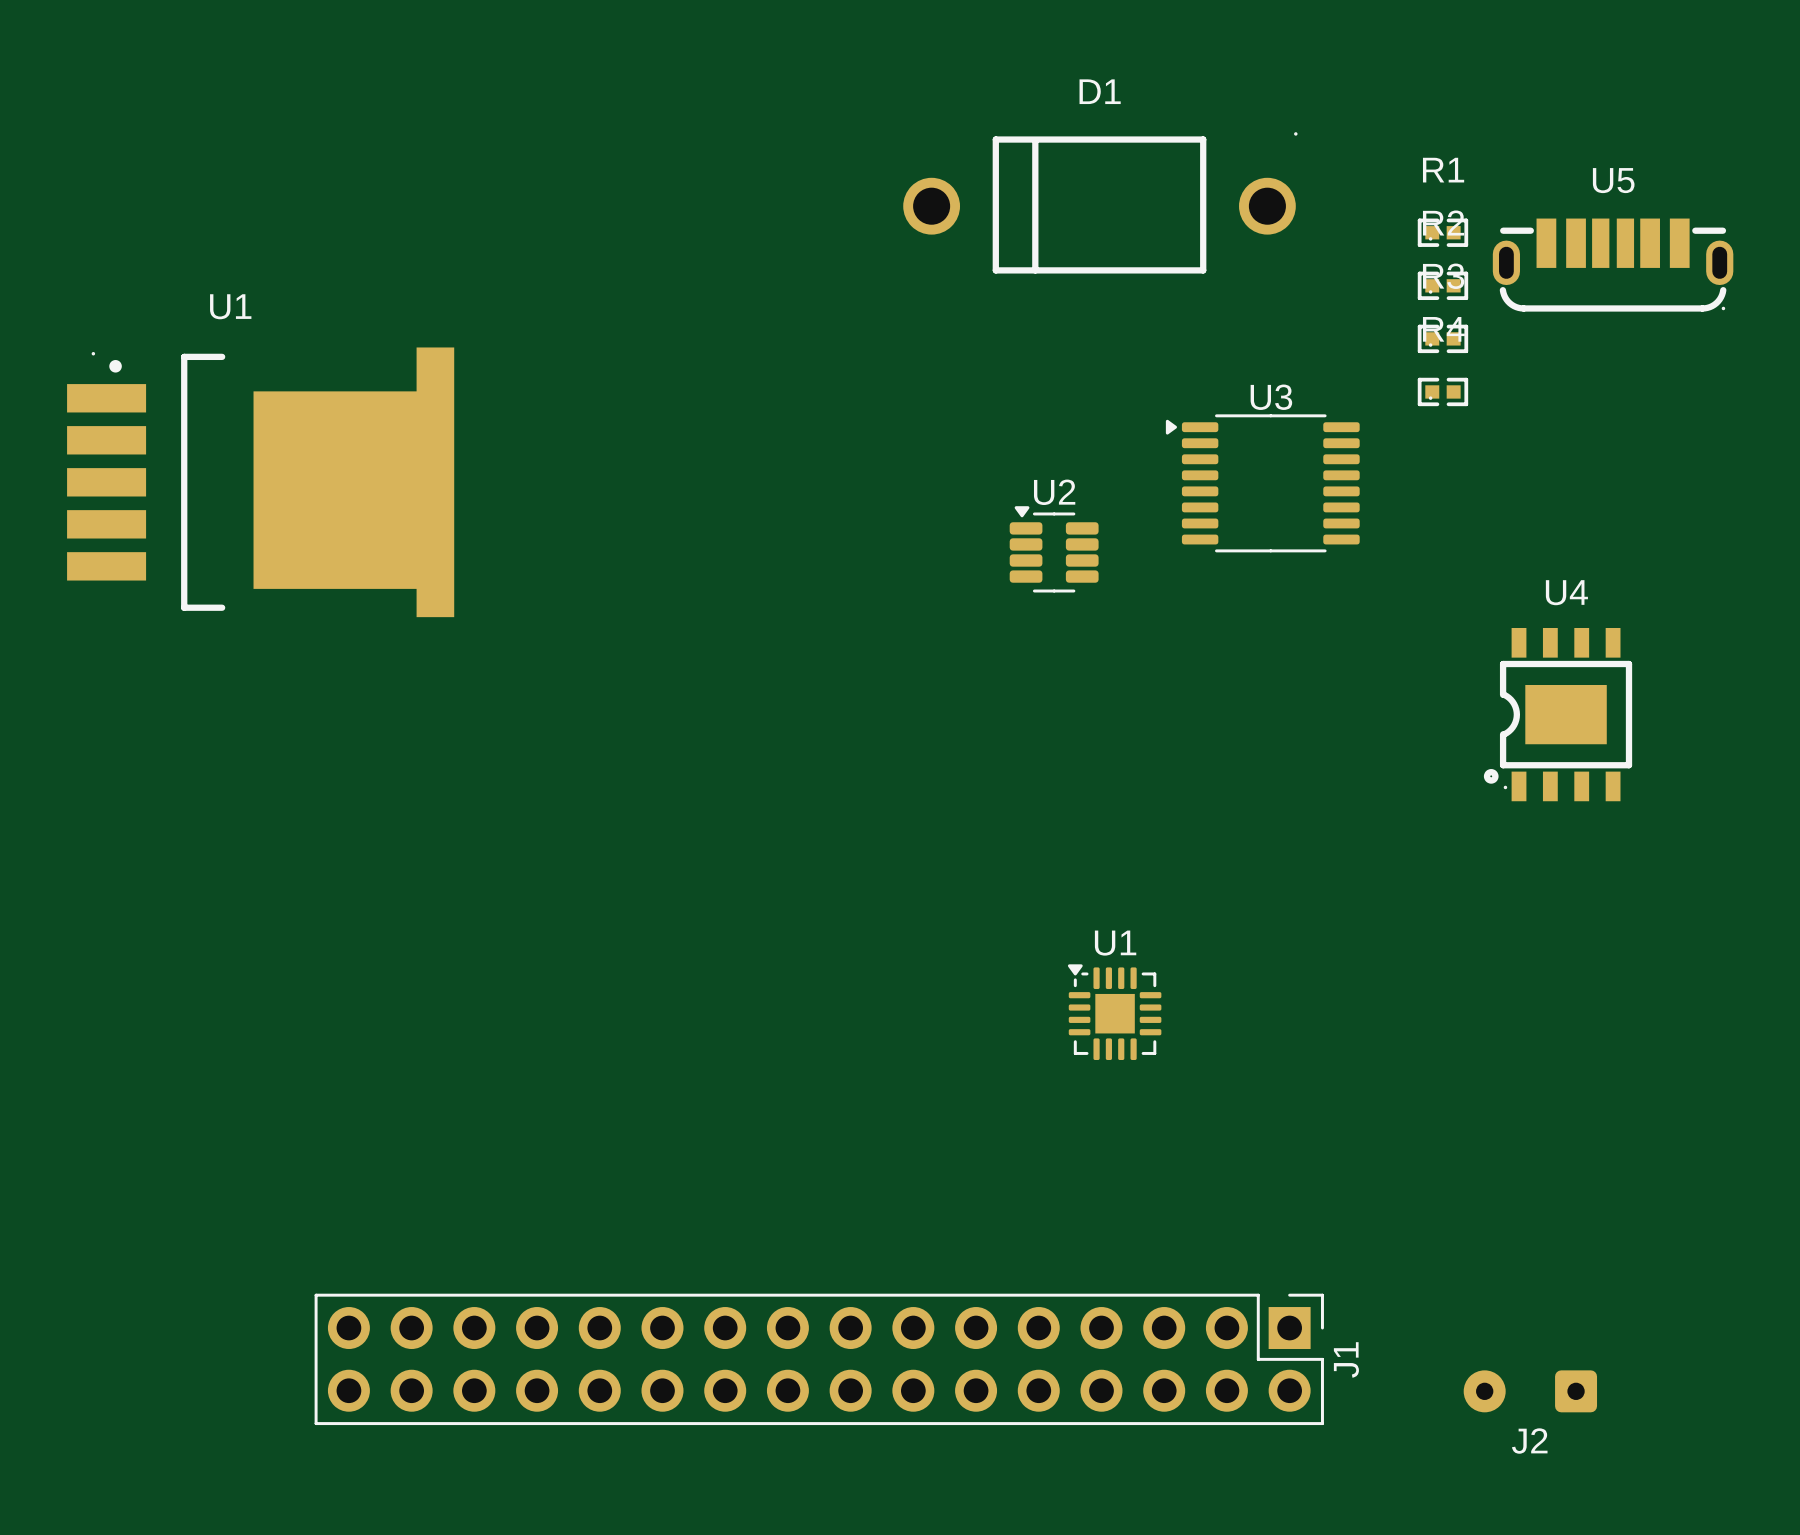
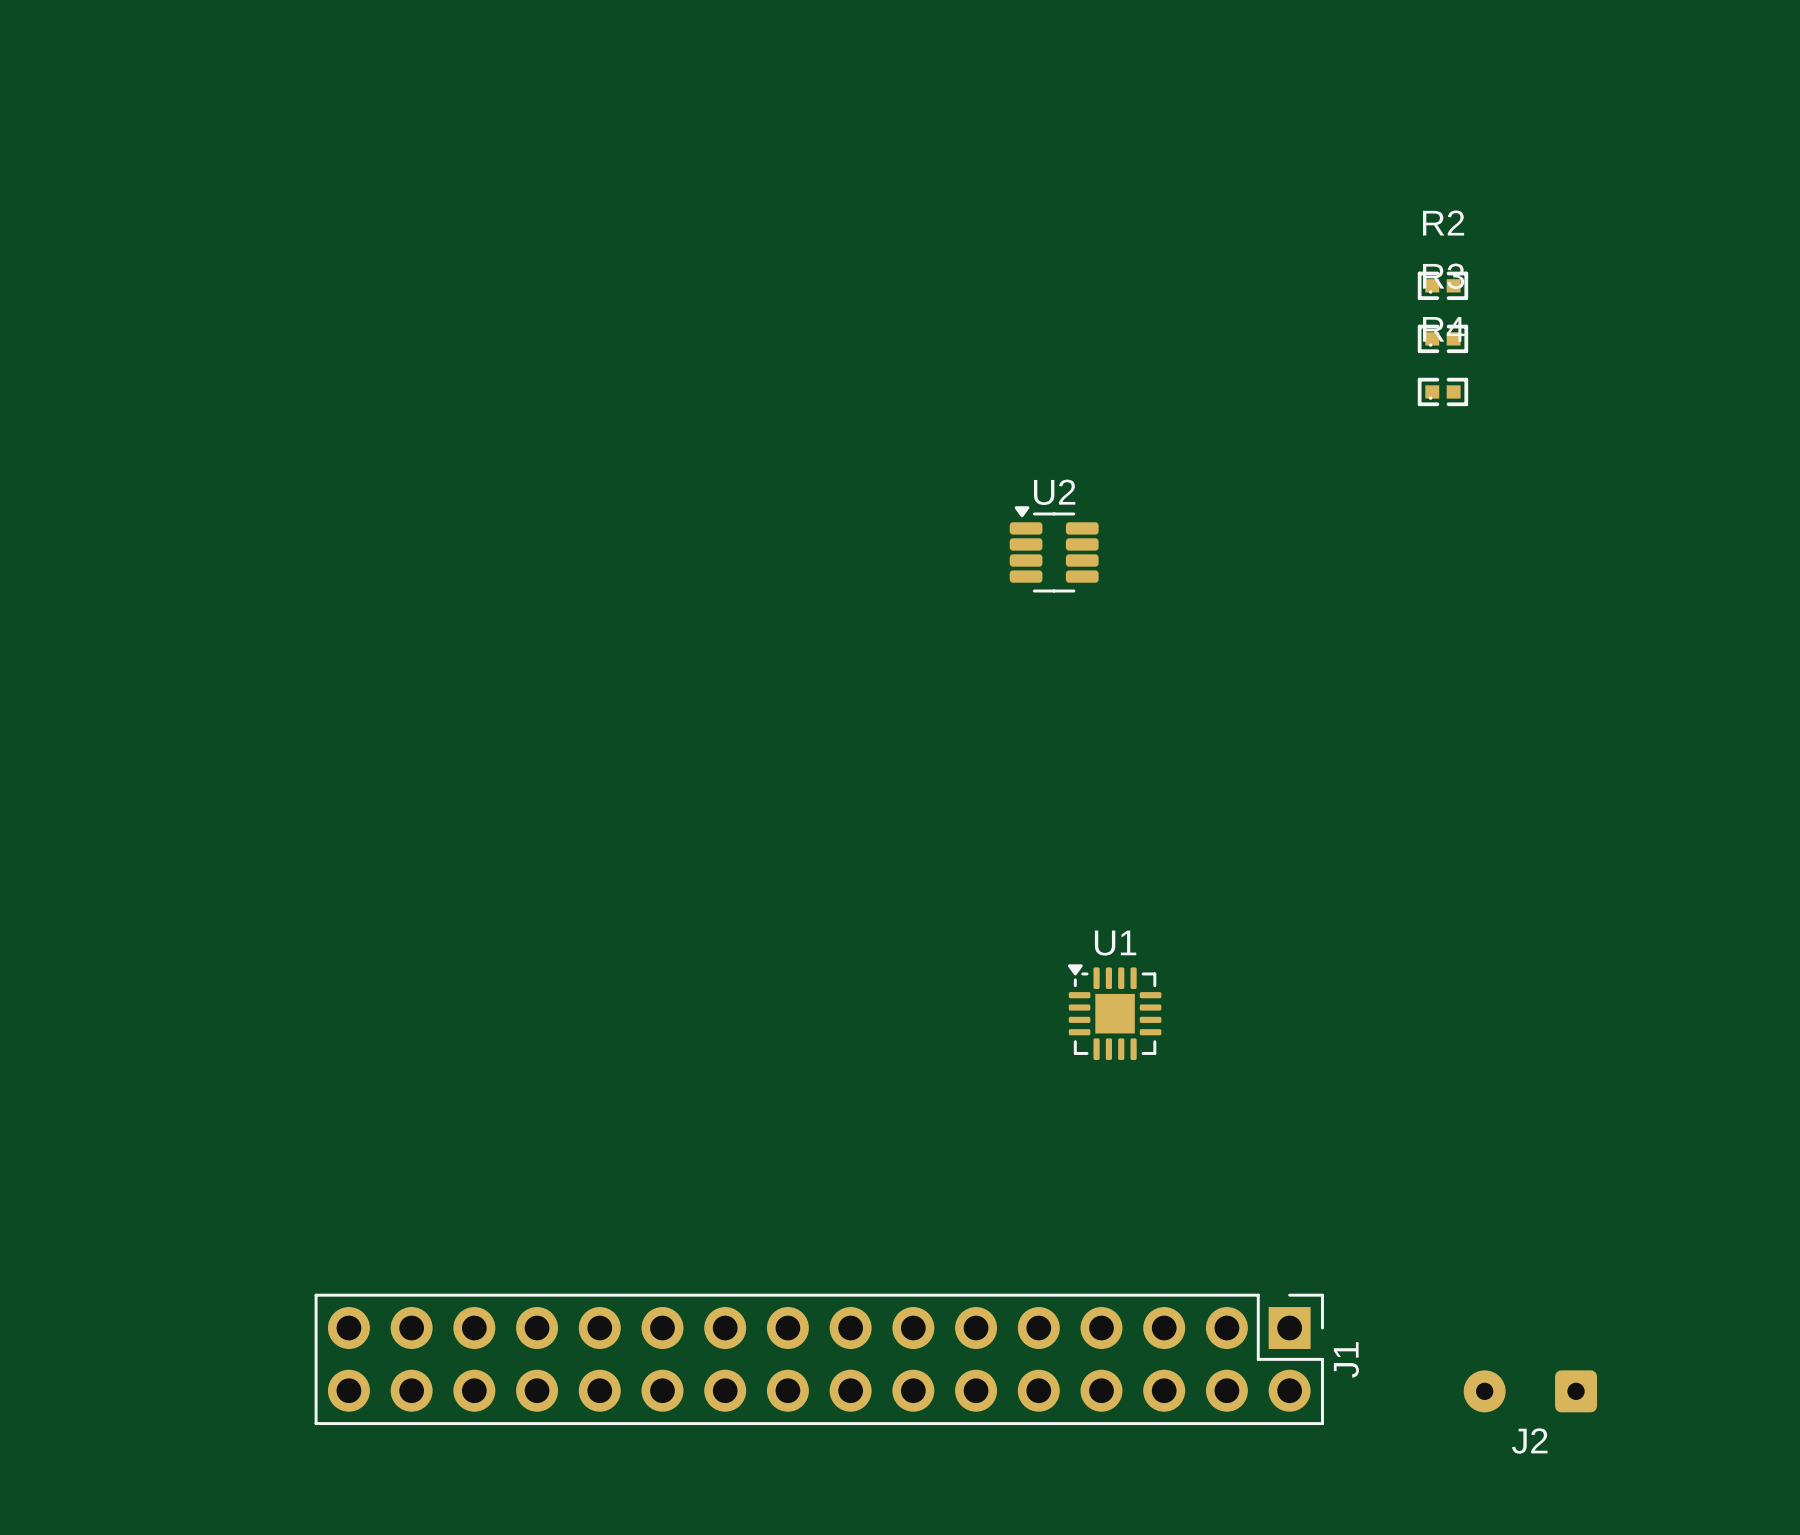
D1: (1100, 202) -> none
R1: (1442, 232) -> none
U5: (1613, 265) -> none
U1: (260, 482) -> none
U3: (1262, 483) -> none
U4: (1558, 714) -> none

